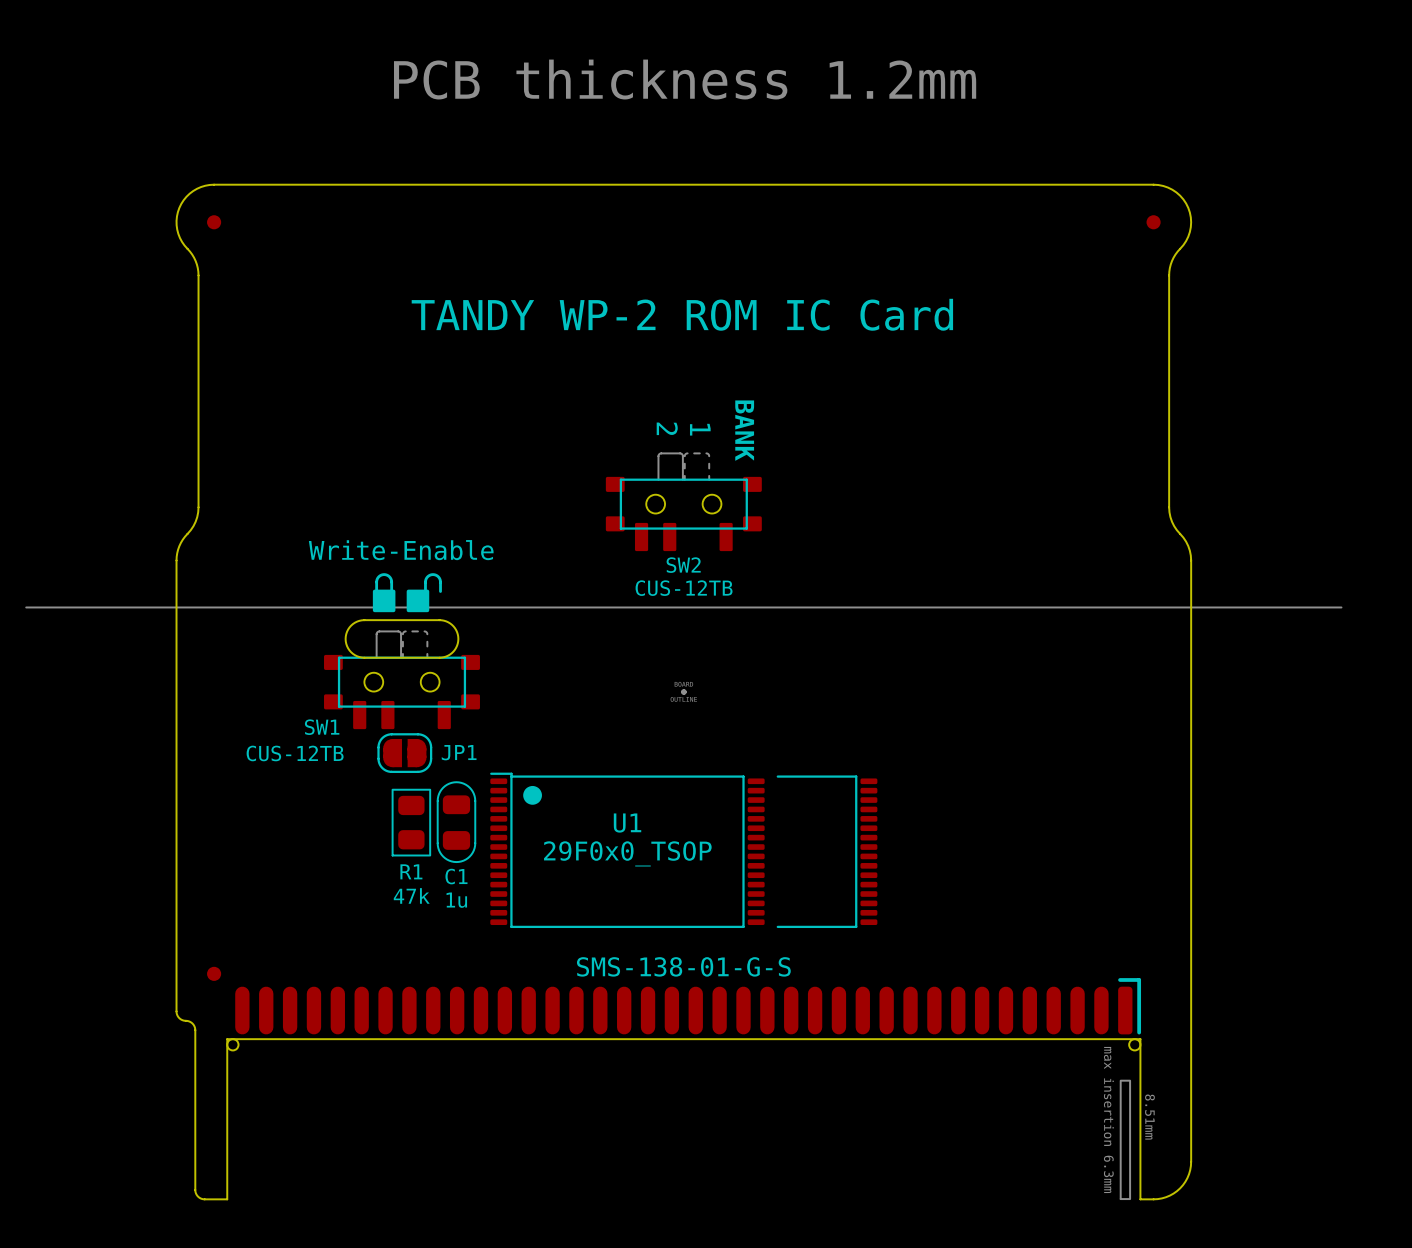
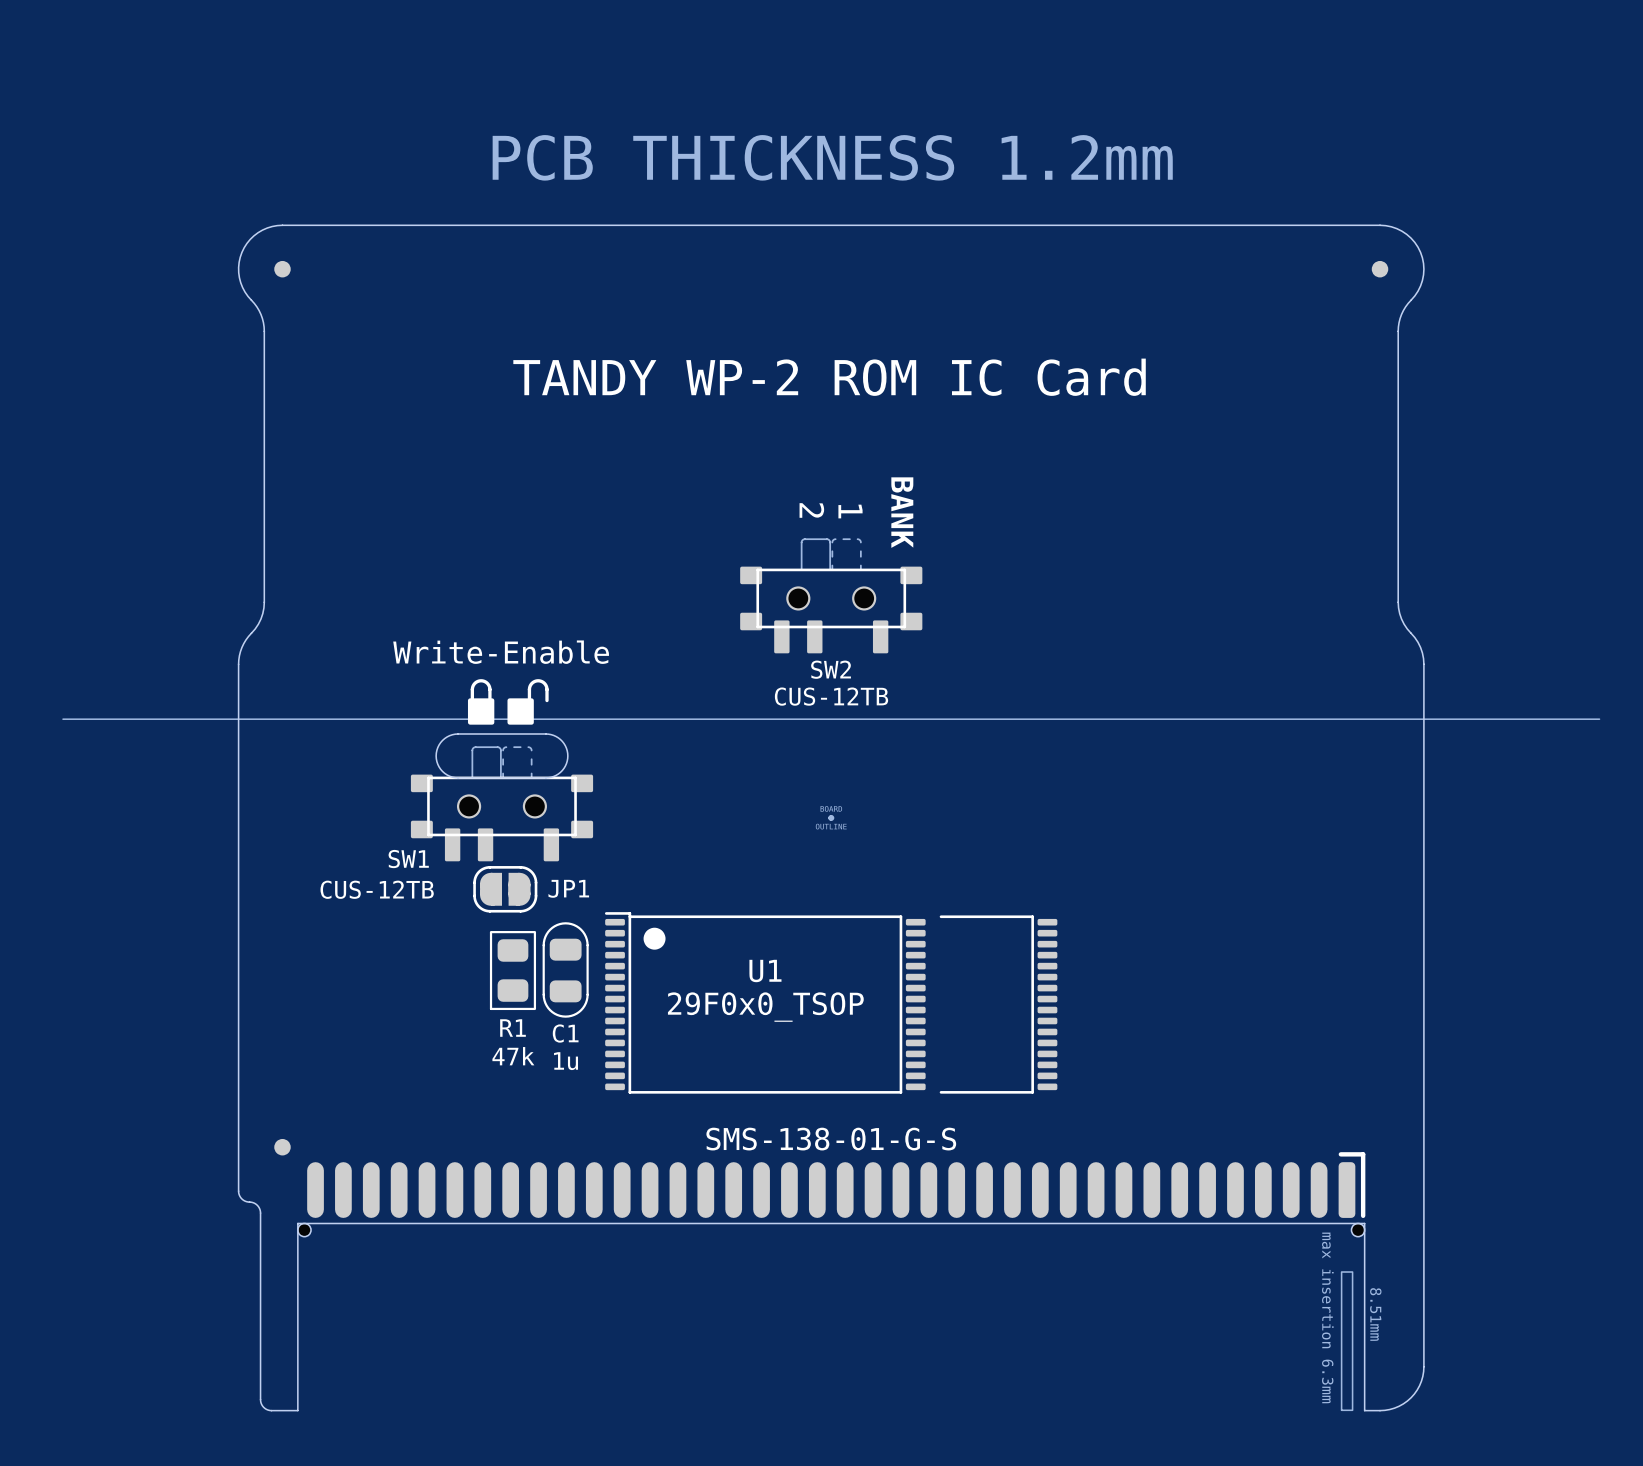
text: PCB thickness 1.2mm (685, 79) -> none
text: none -> PCB THICKNESS 1.2mm (832, 157)

